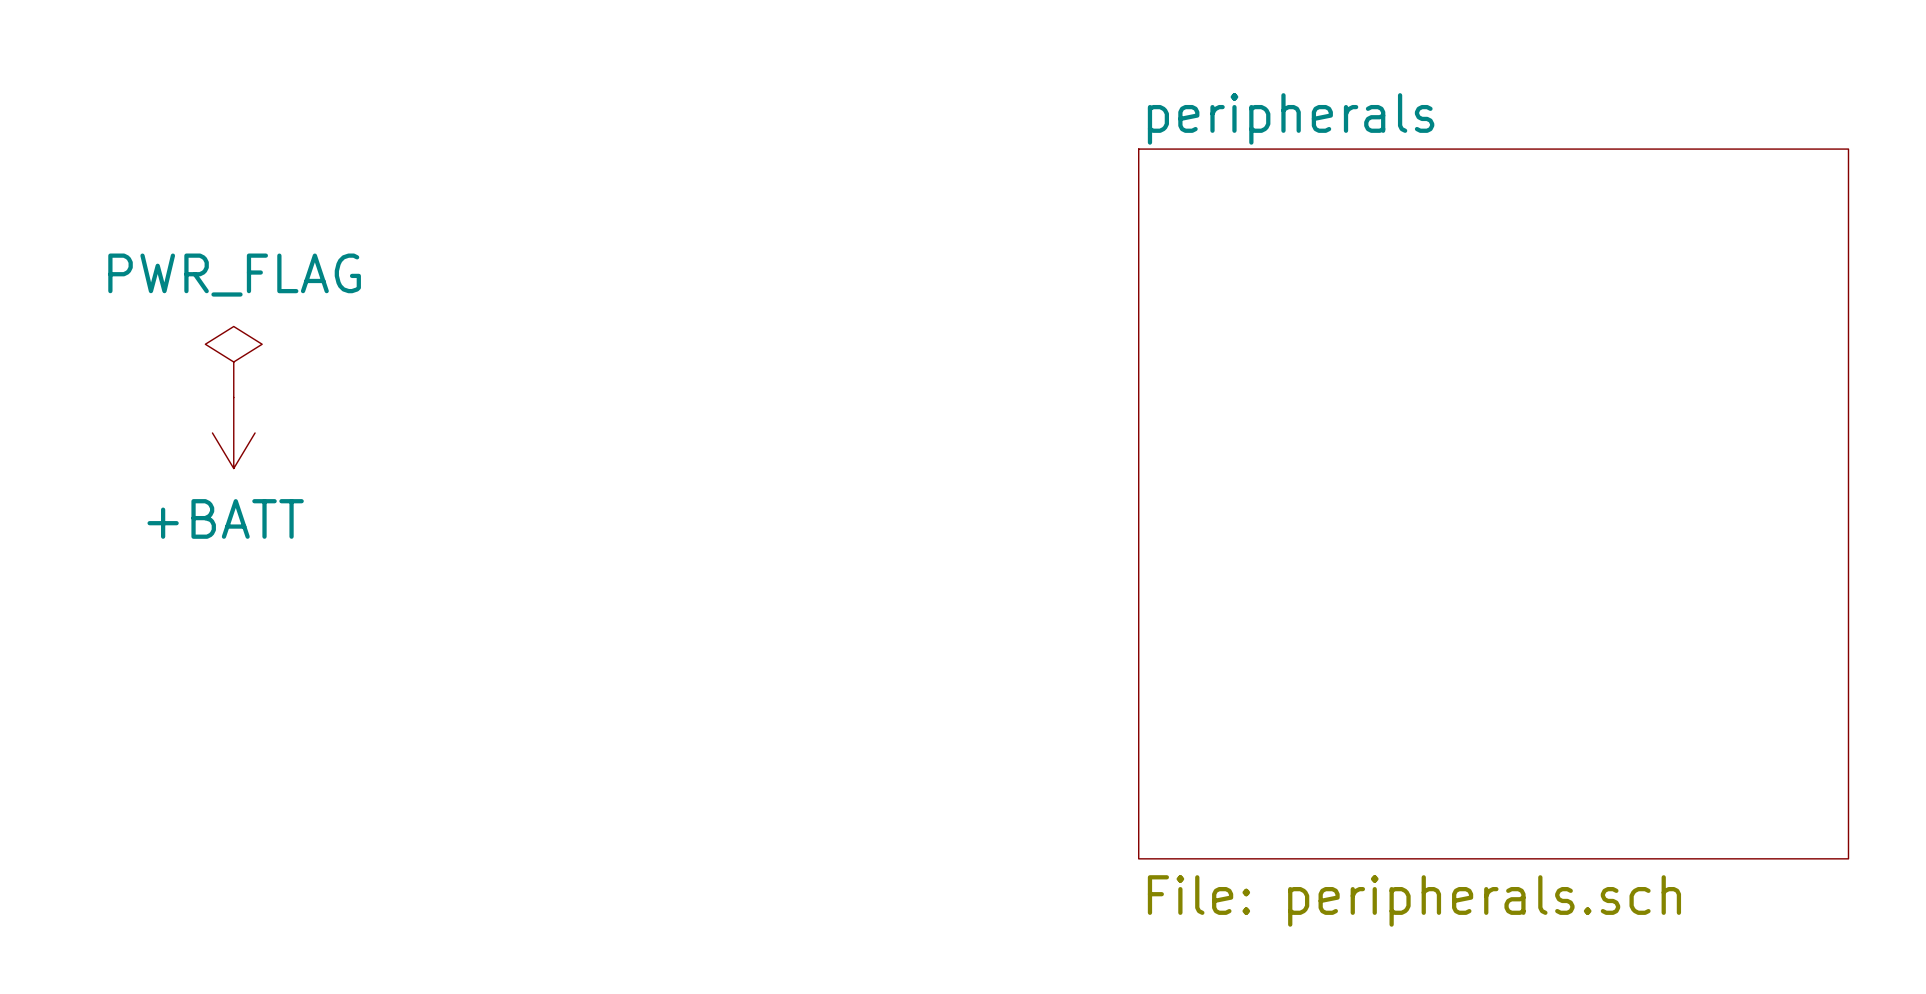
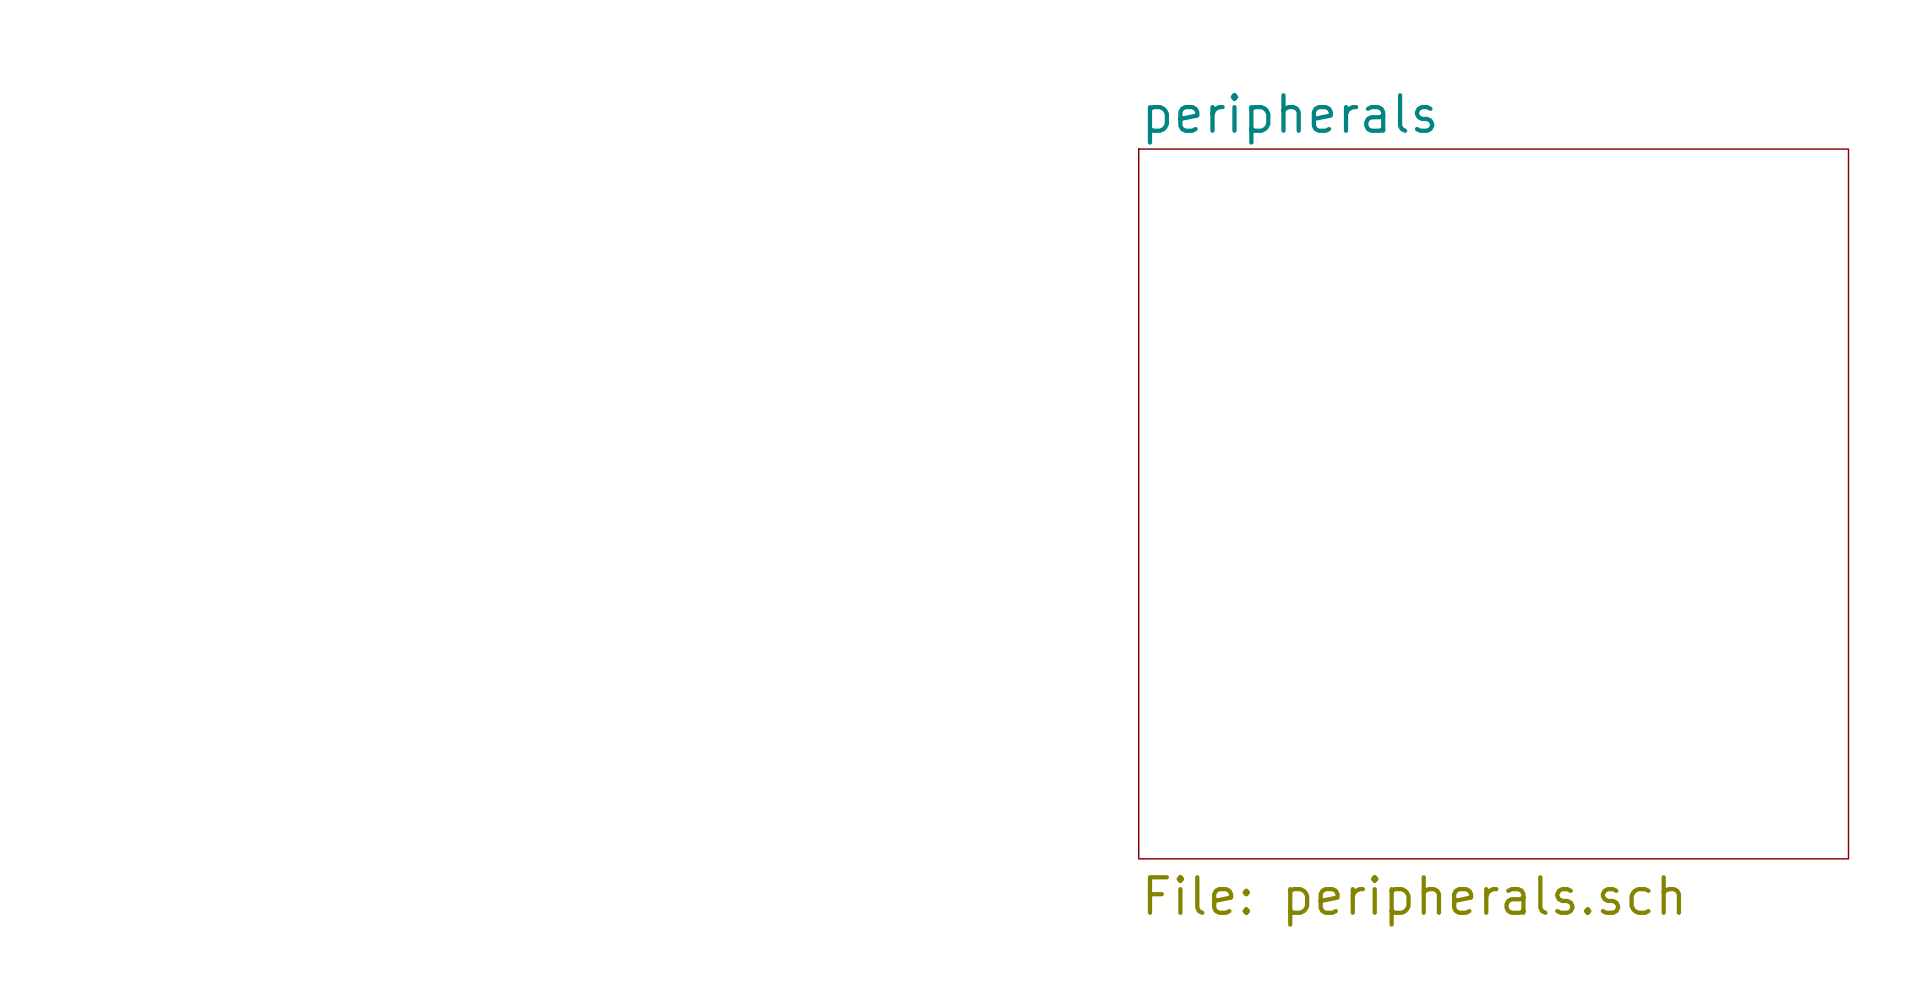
power symbol: PWR_FLAG (233, 362) -> none
power symbol: +BATT (233, 432) -> none

